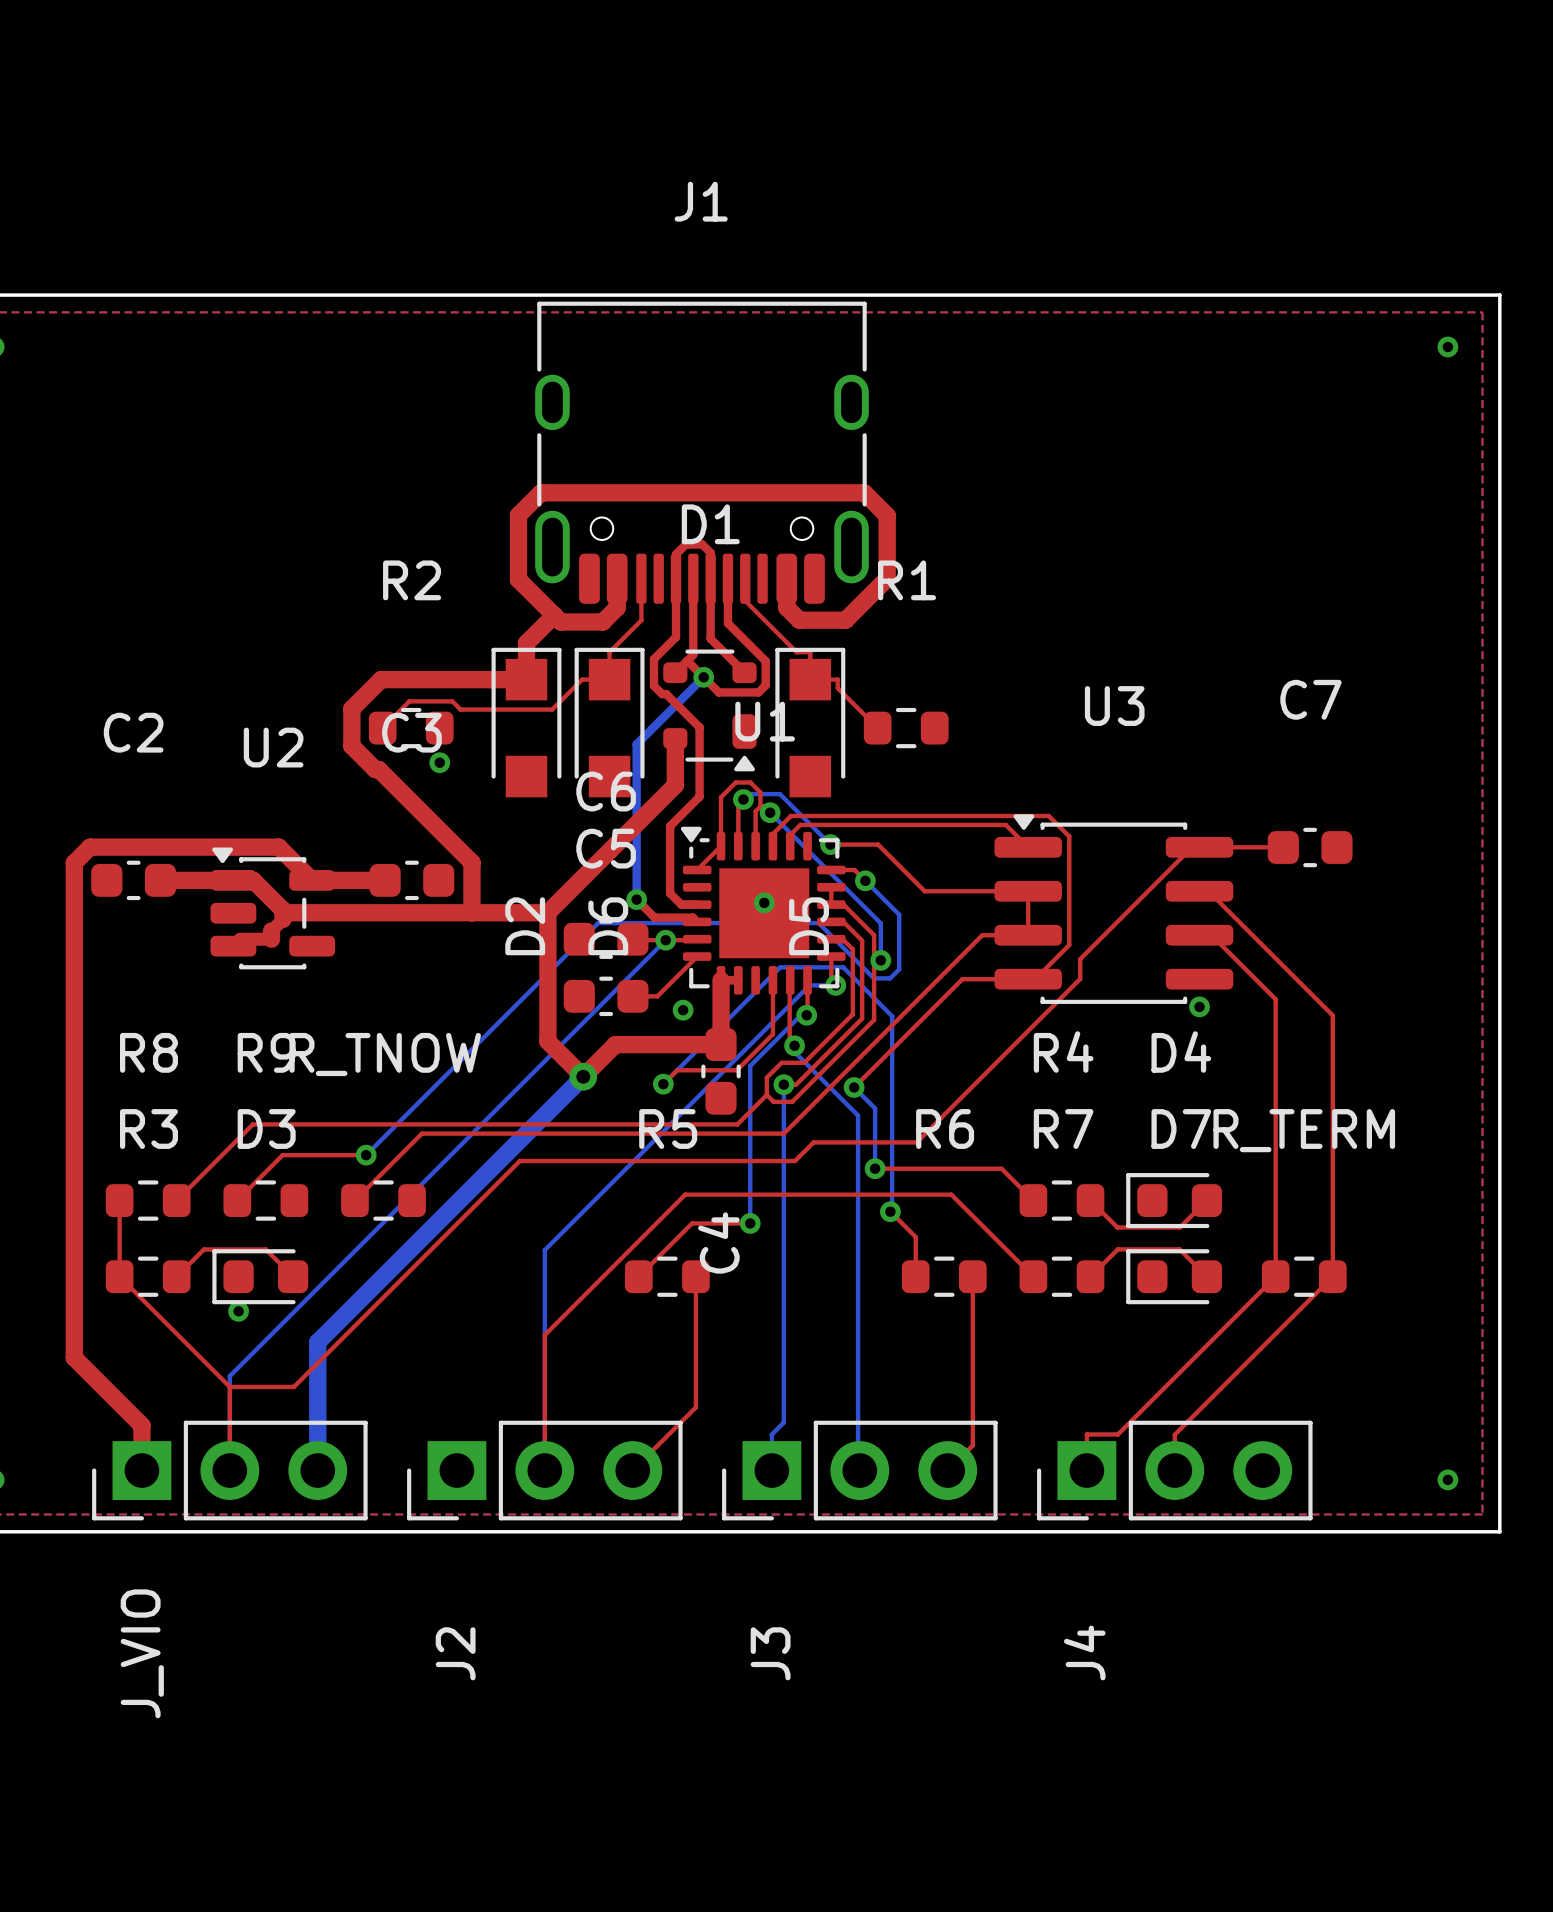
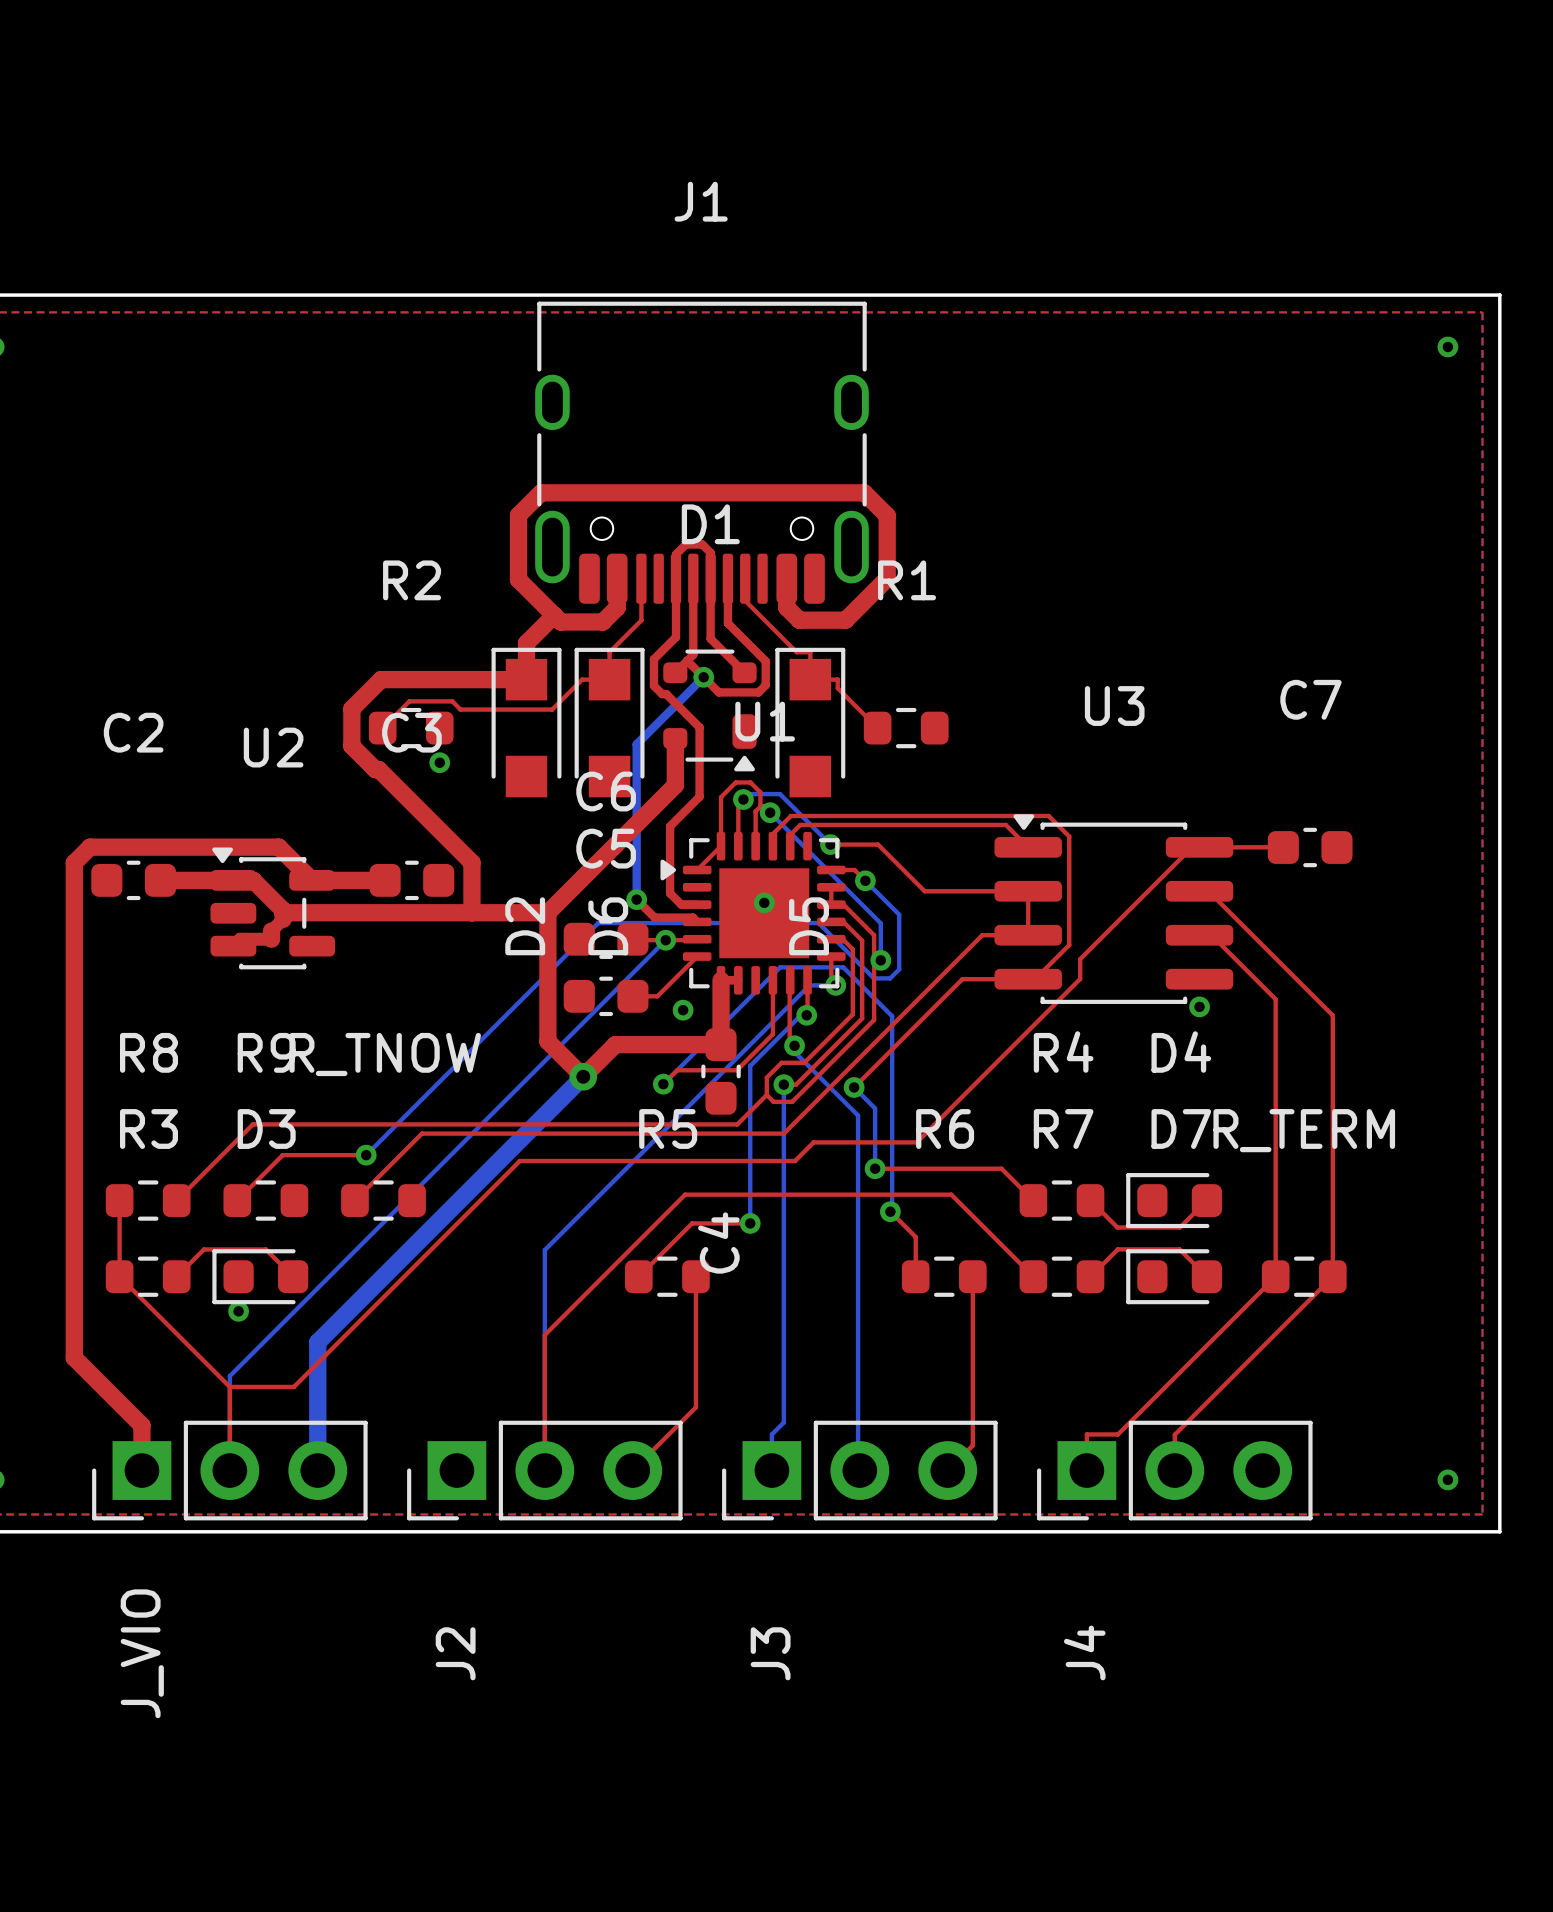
U1 footprint: [680, 826, 846, 995] -> [660, 831, 846, 995]

